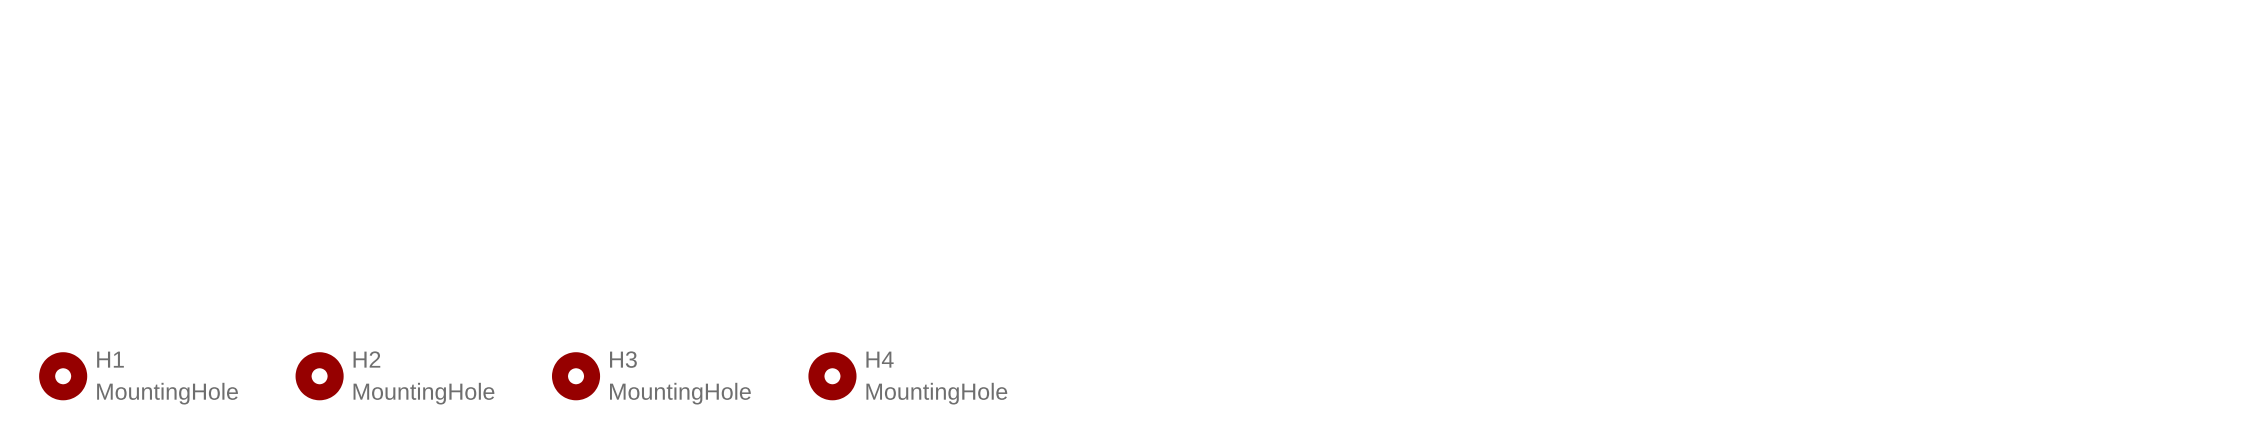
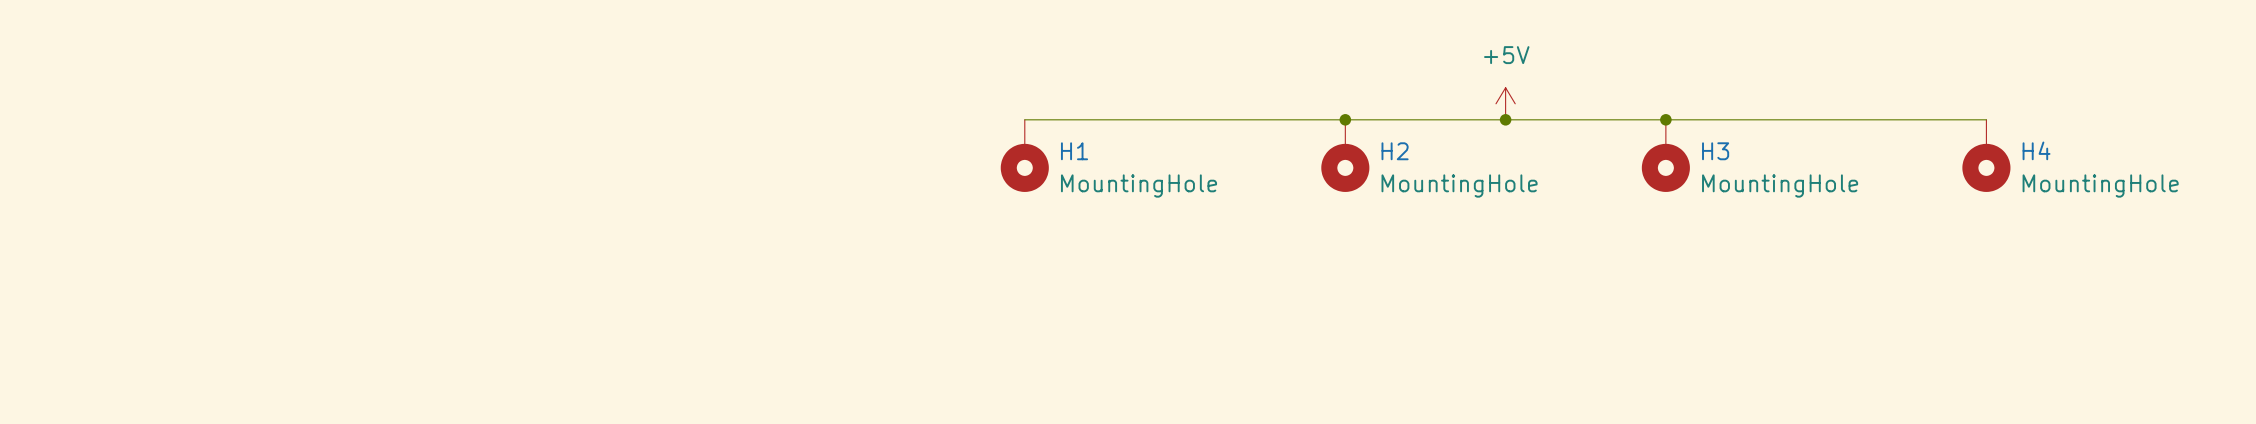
power symbol: none -> +5V (1505, 103)
wire: none -> (1024, 119) (1986, 119)
junction: none -> (1345, 119)
junction: none -> (1505, 119)
junction: none -> (1665, 119)
H1 symbol: [39, 352, 88, 401] -> [1000, 119, 1049, 192]
H2 symbol: [295, 352, 344, 401] -> [1321, 119, 1370, 192]
H3 symbol: [551, 352, 601, 401] -> [1641, 119, 1690, 192]
H4 symbol: [808, 352, 857, 401] -> [1962, 119, 2011, 192]

